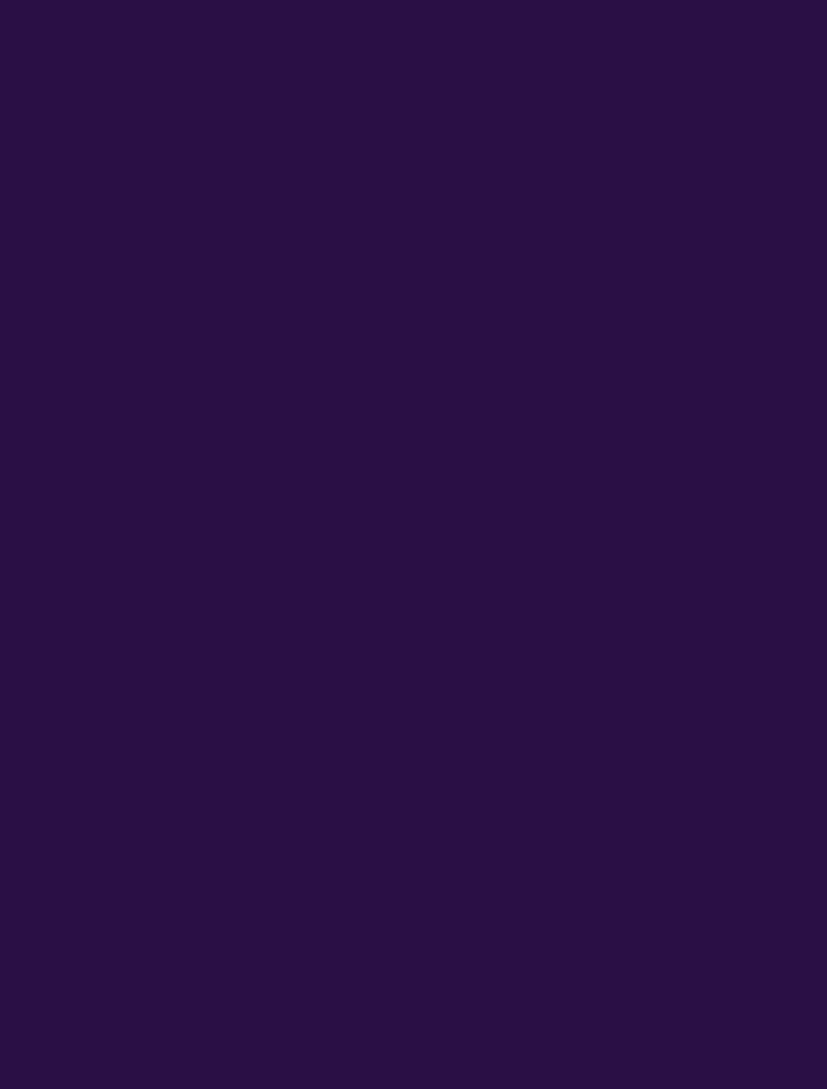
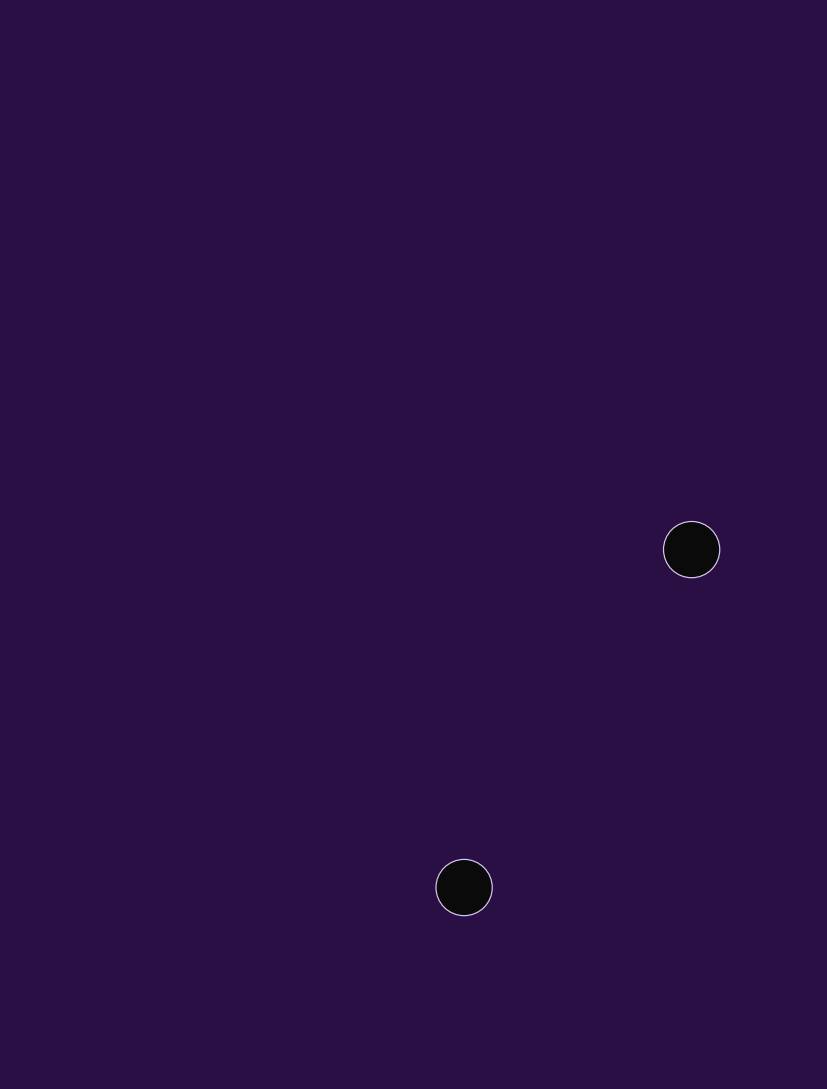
part: none -> (691, 549)
part: none -> (464, 887)

